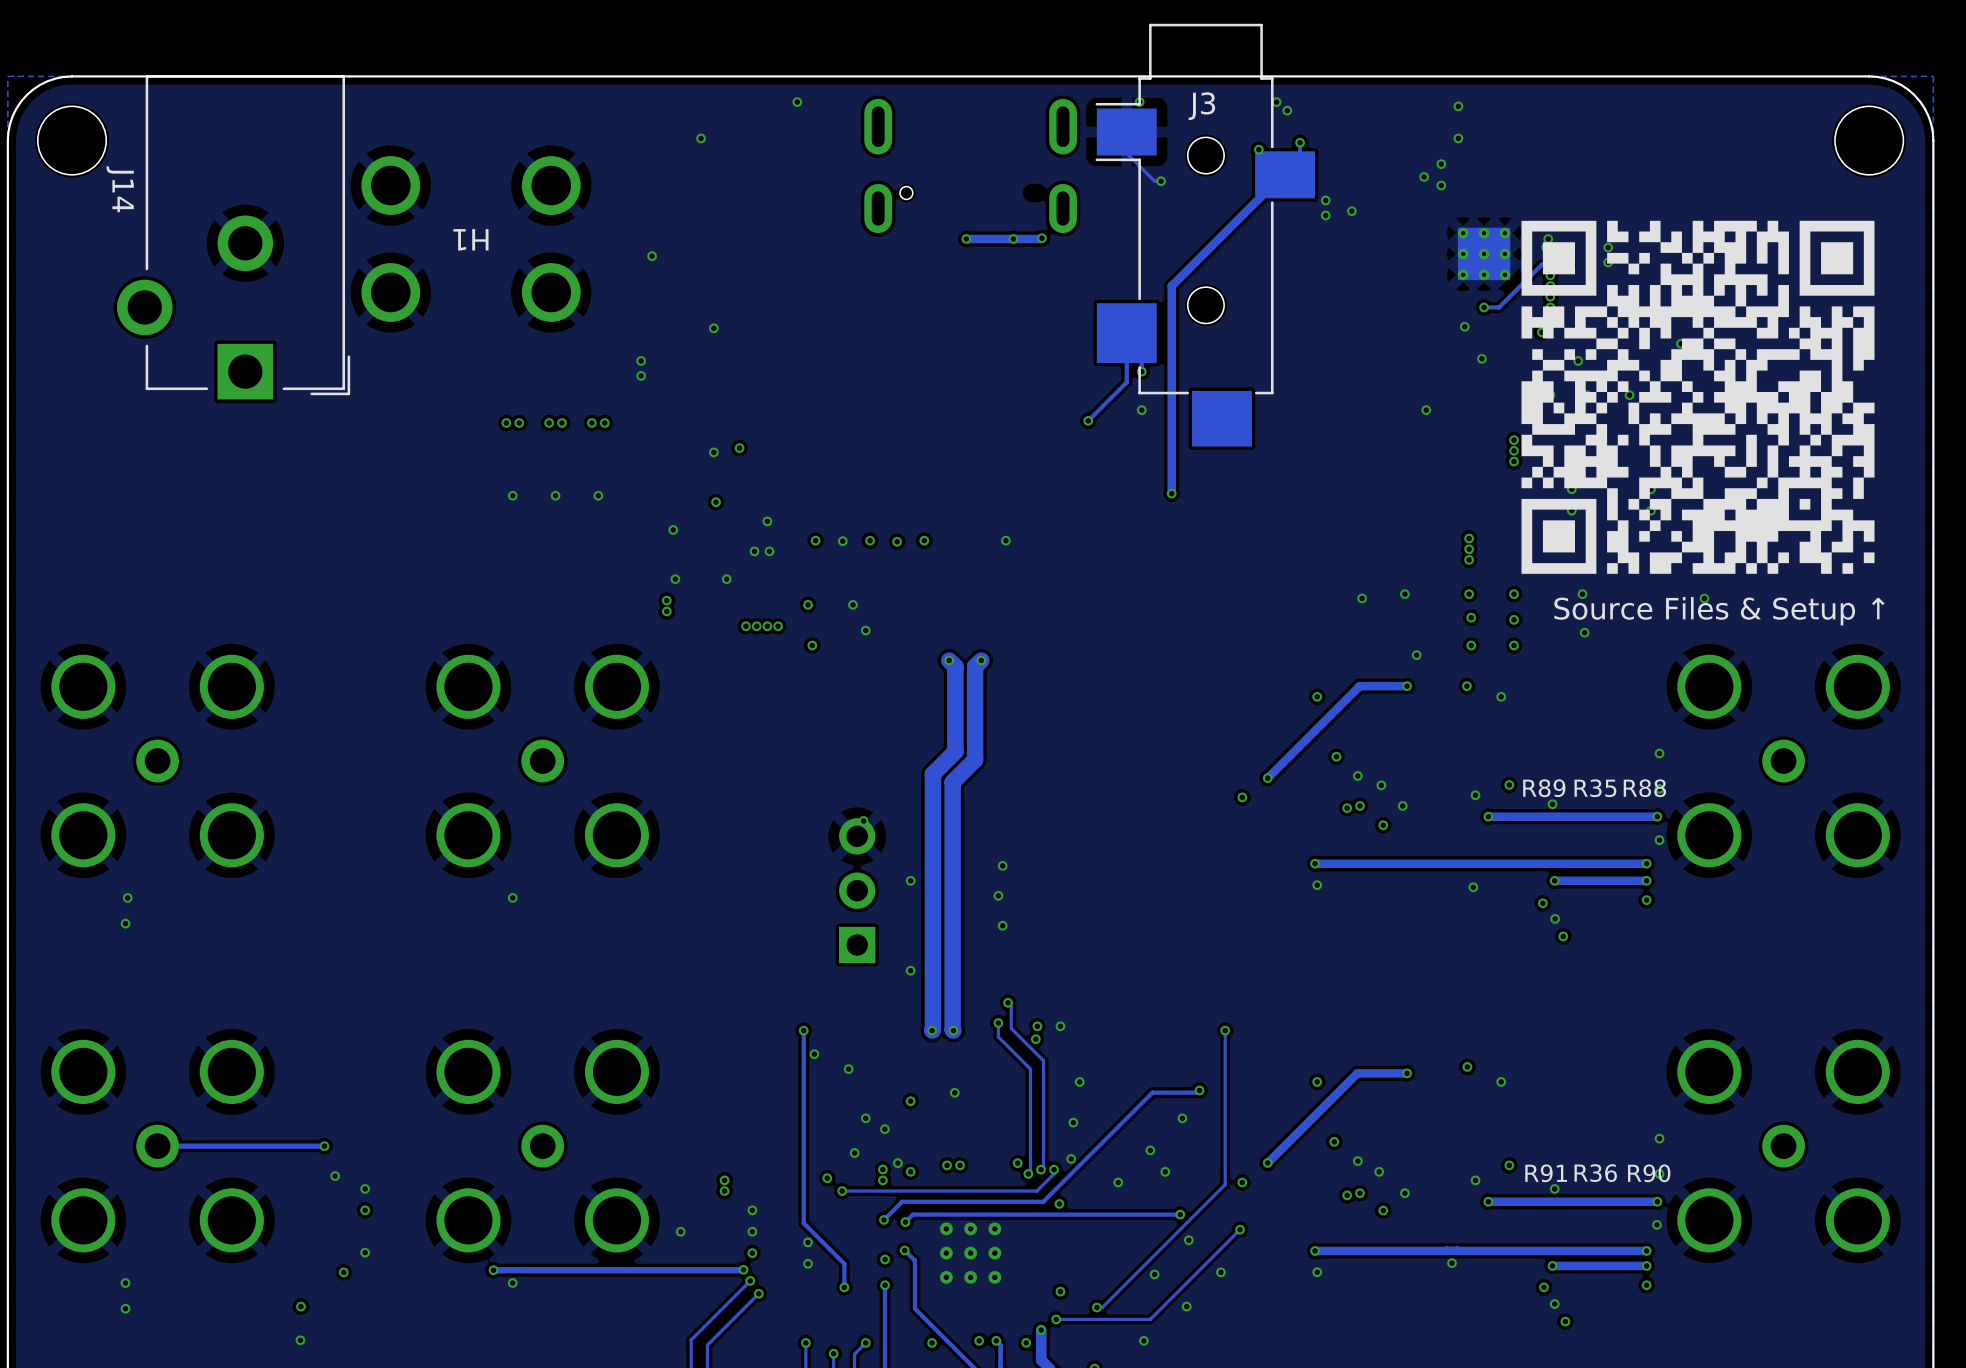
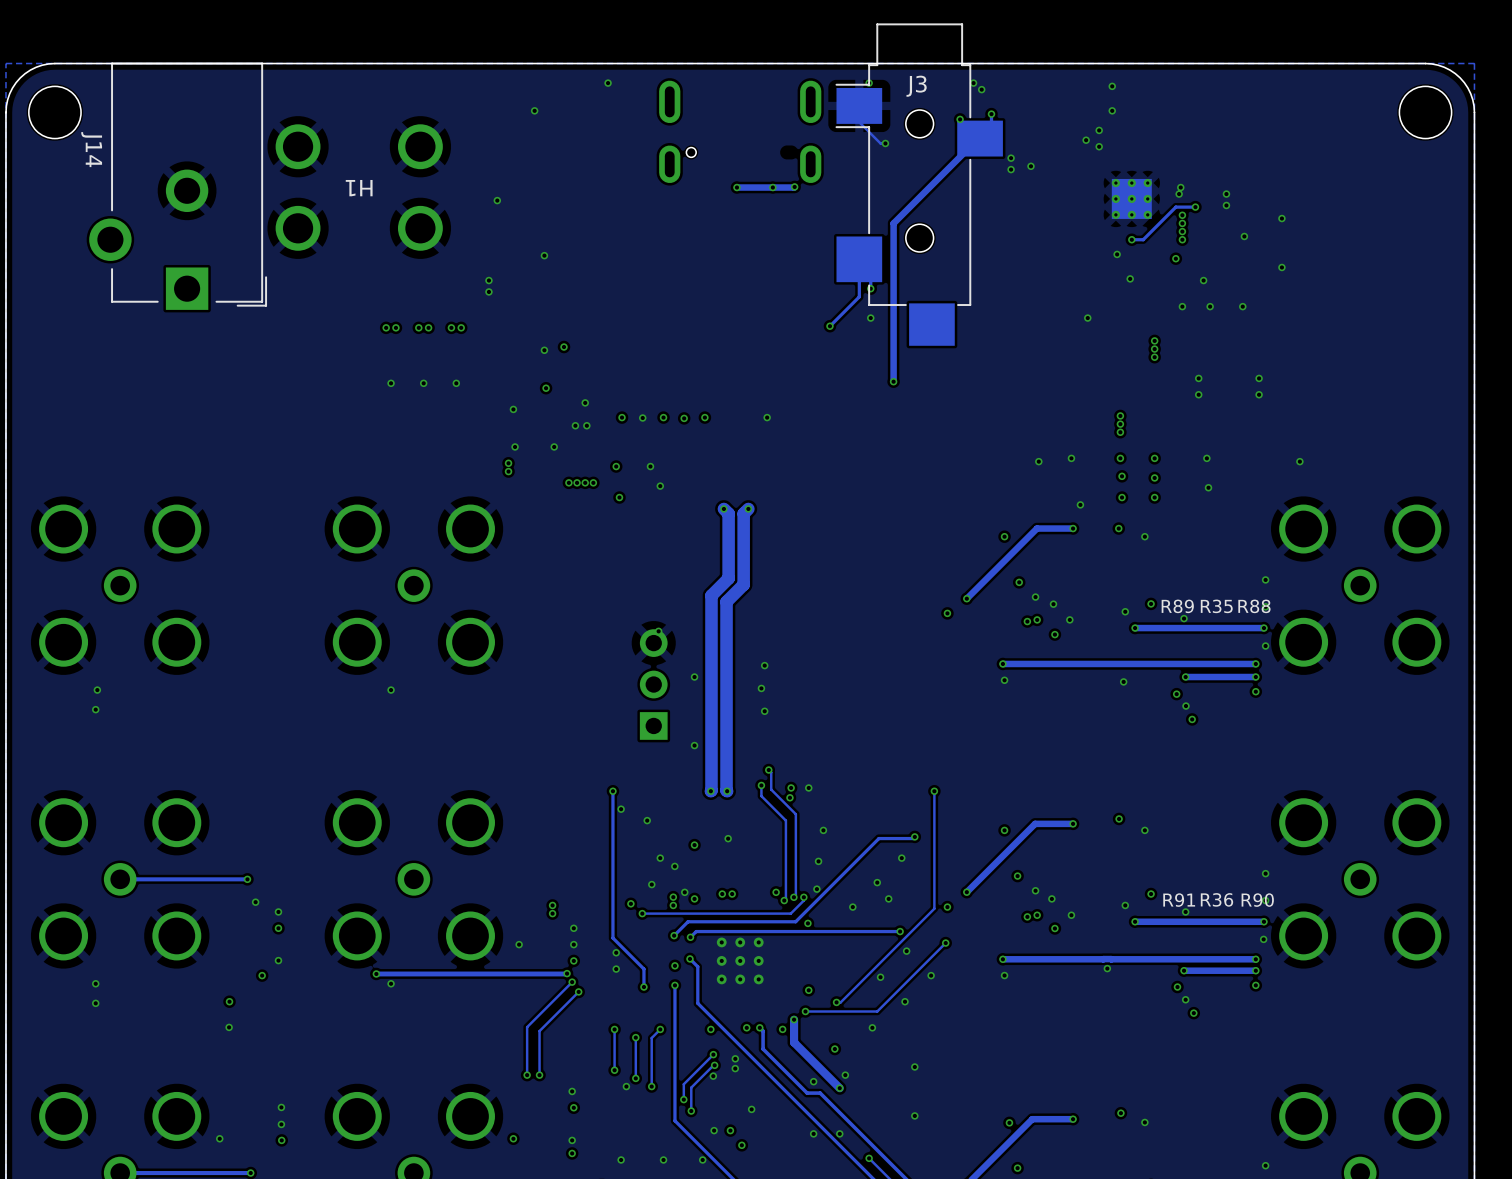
drawing: [1521, 220, 1875, 574] -> none
text: Source Files & Setup ↑ (1719, 611) -> none

